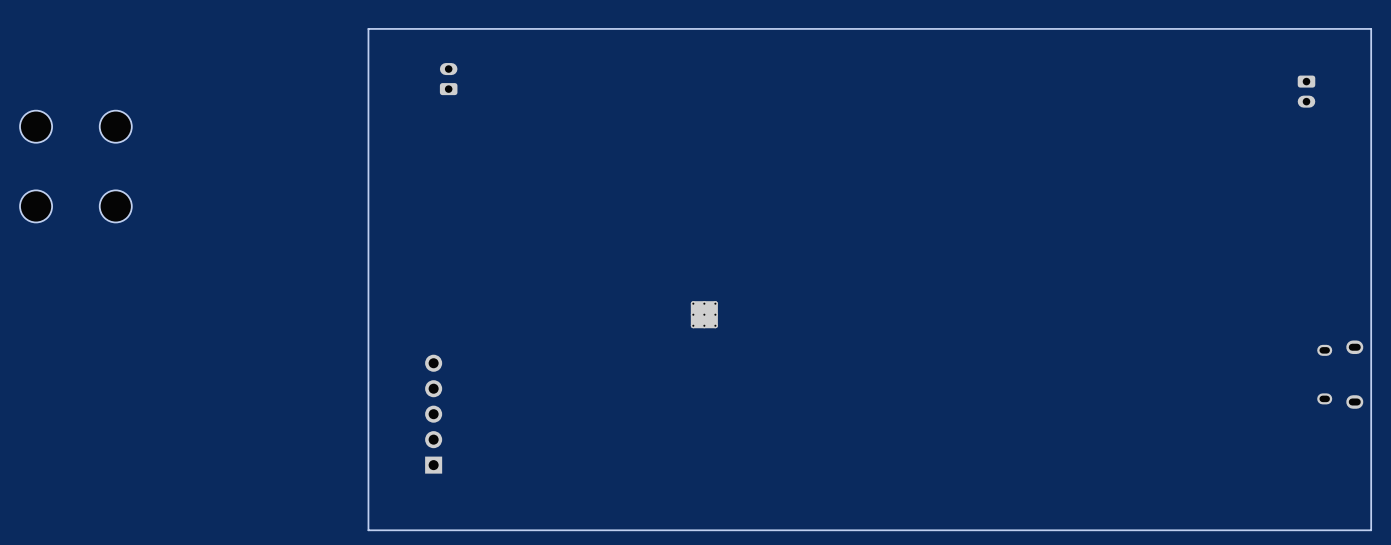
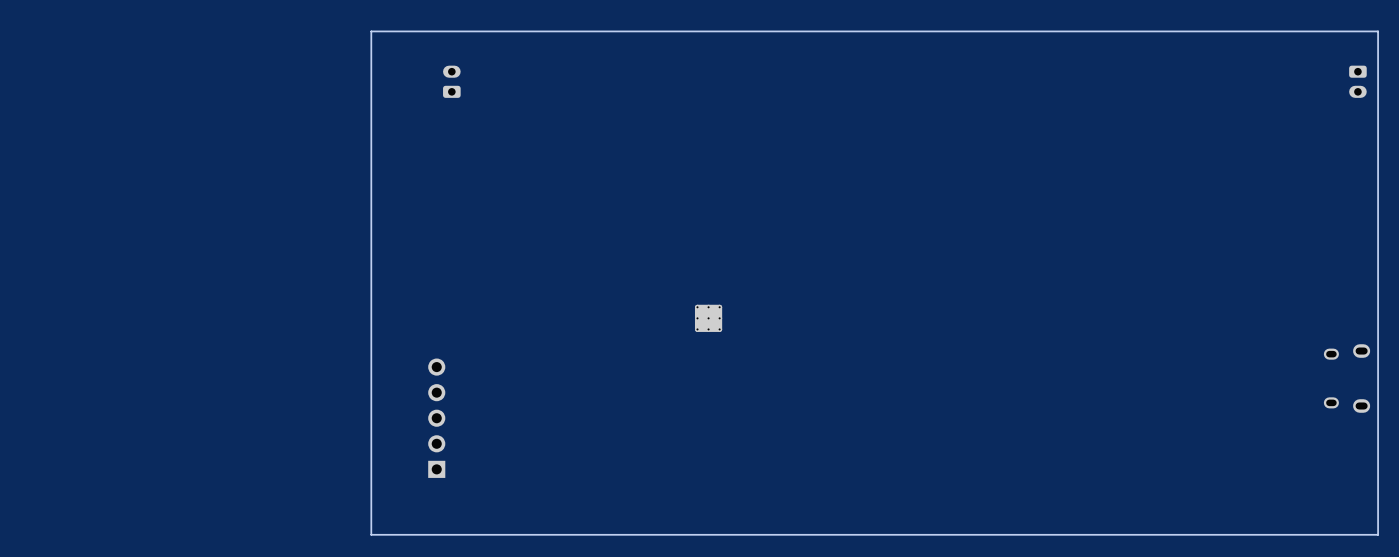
part position: (1306, 91) -> (1357, 81)
part: (36, 126) -> none
part: (115, 126) -> none
part: (36, 206) -> none
part: (115, 206) -> none

